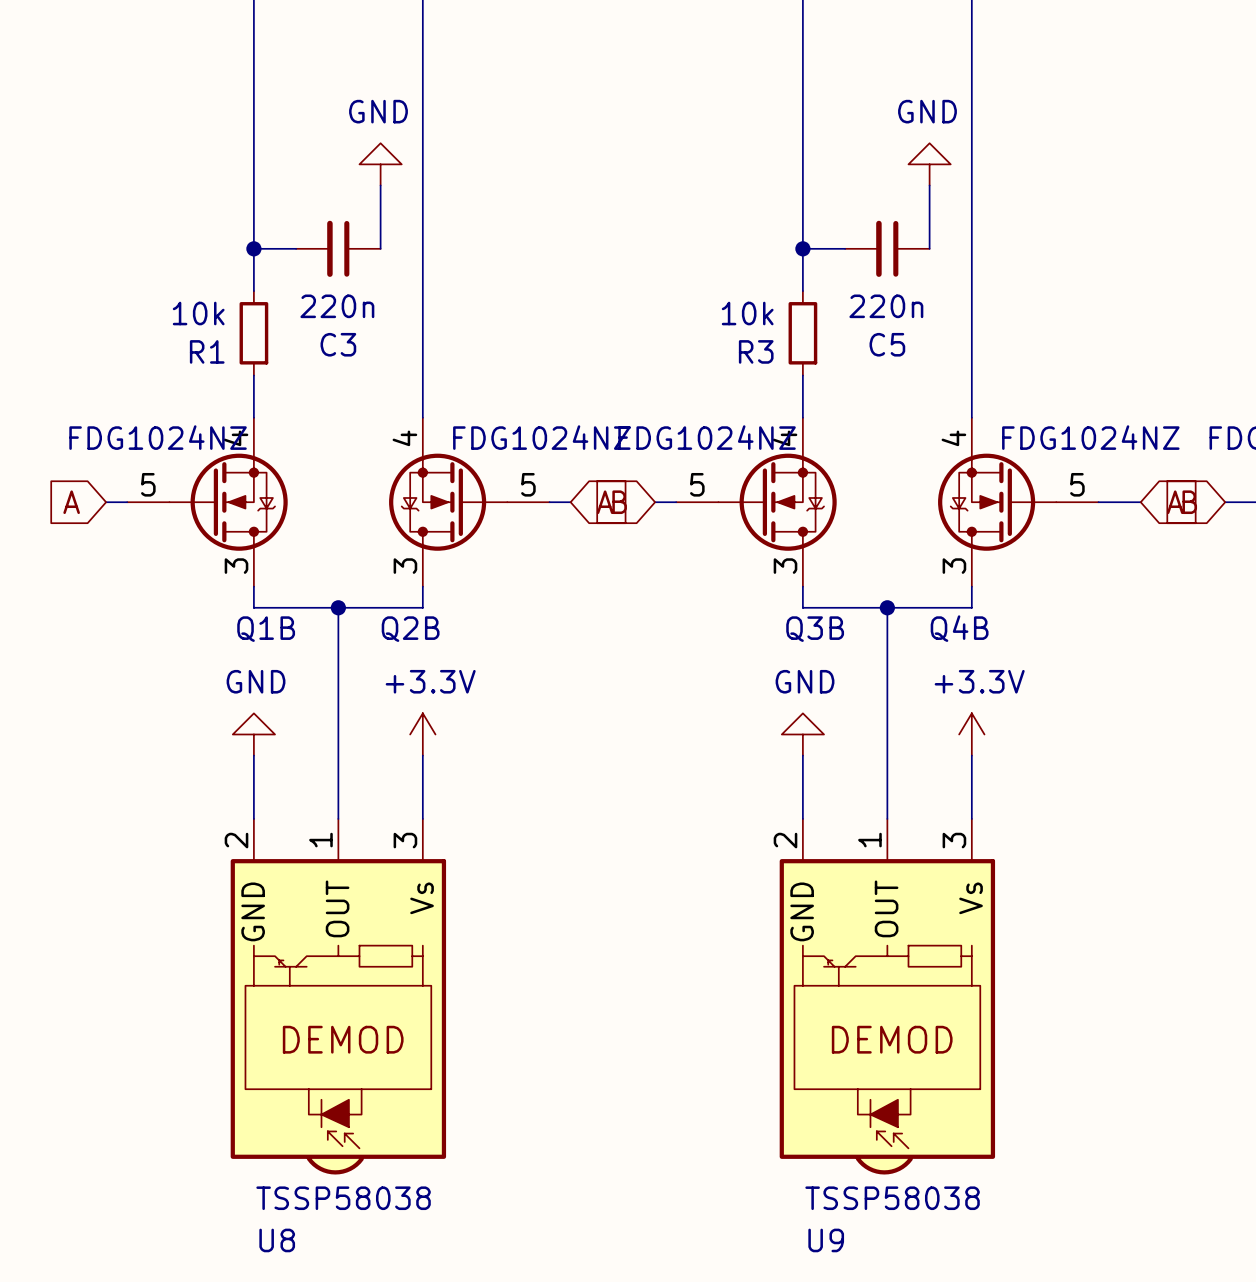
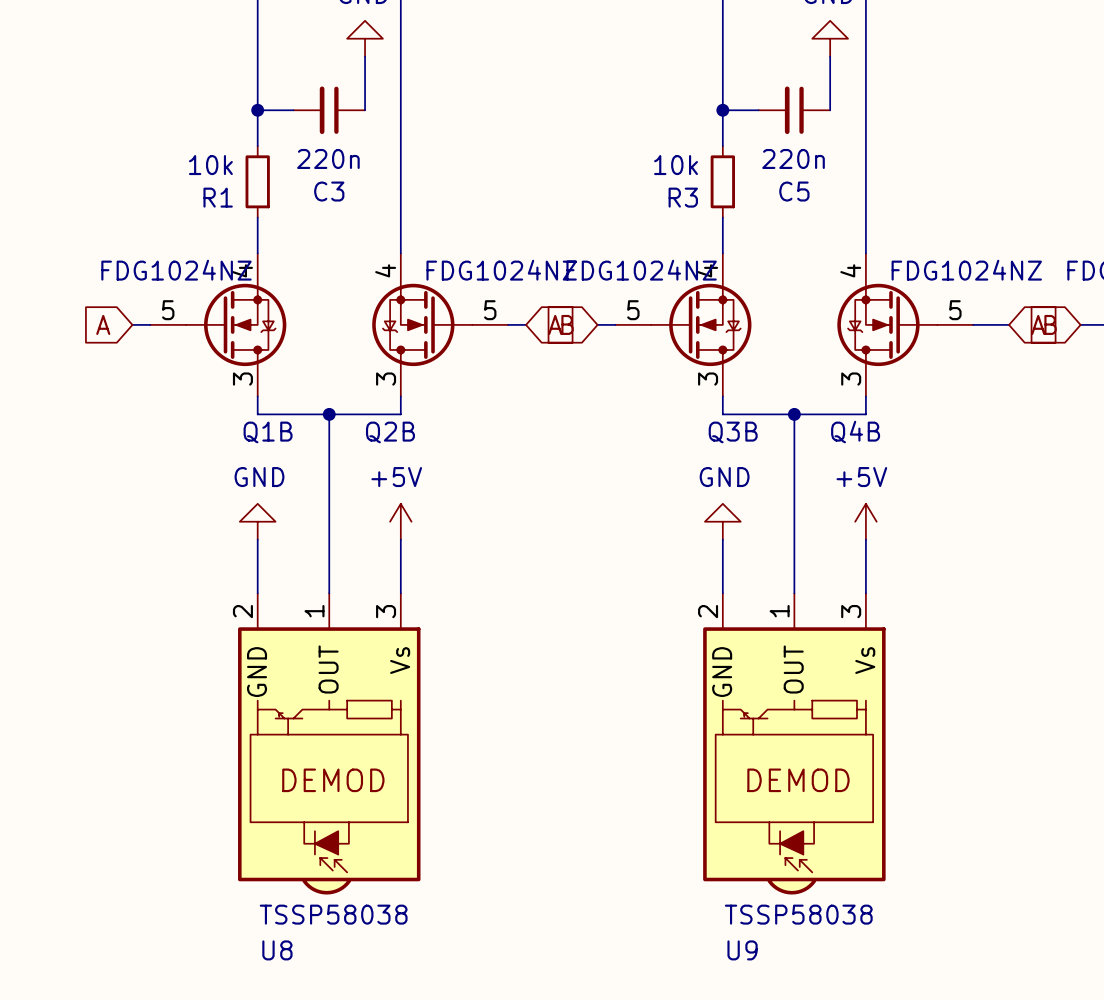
power symbol: +3.3V (422, 734) -> +5V (400, 521)
power symbol: +3.3V (971, 734) -> +5V (865, 521)

